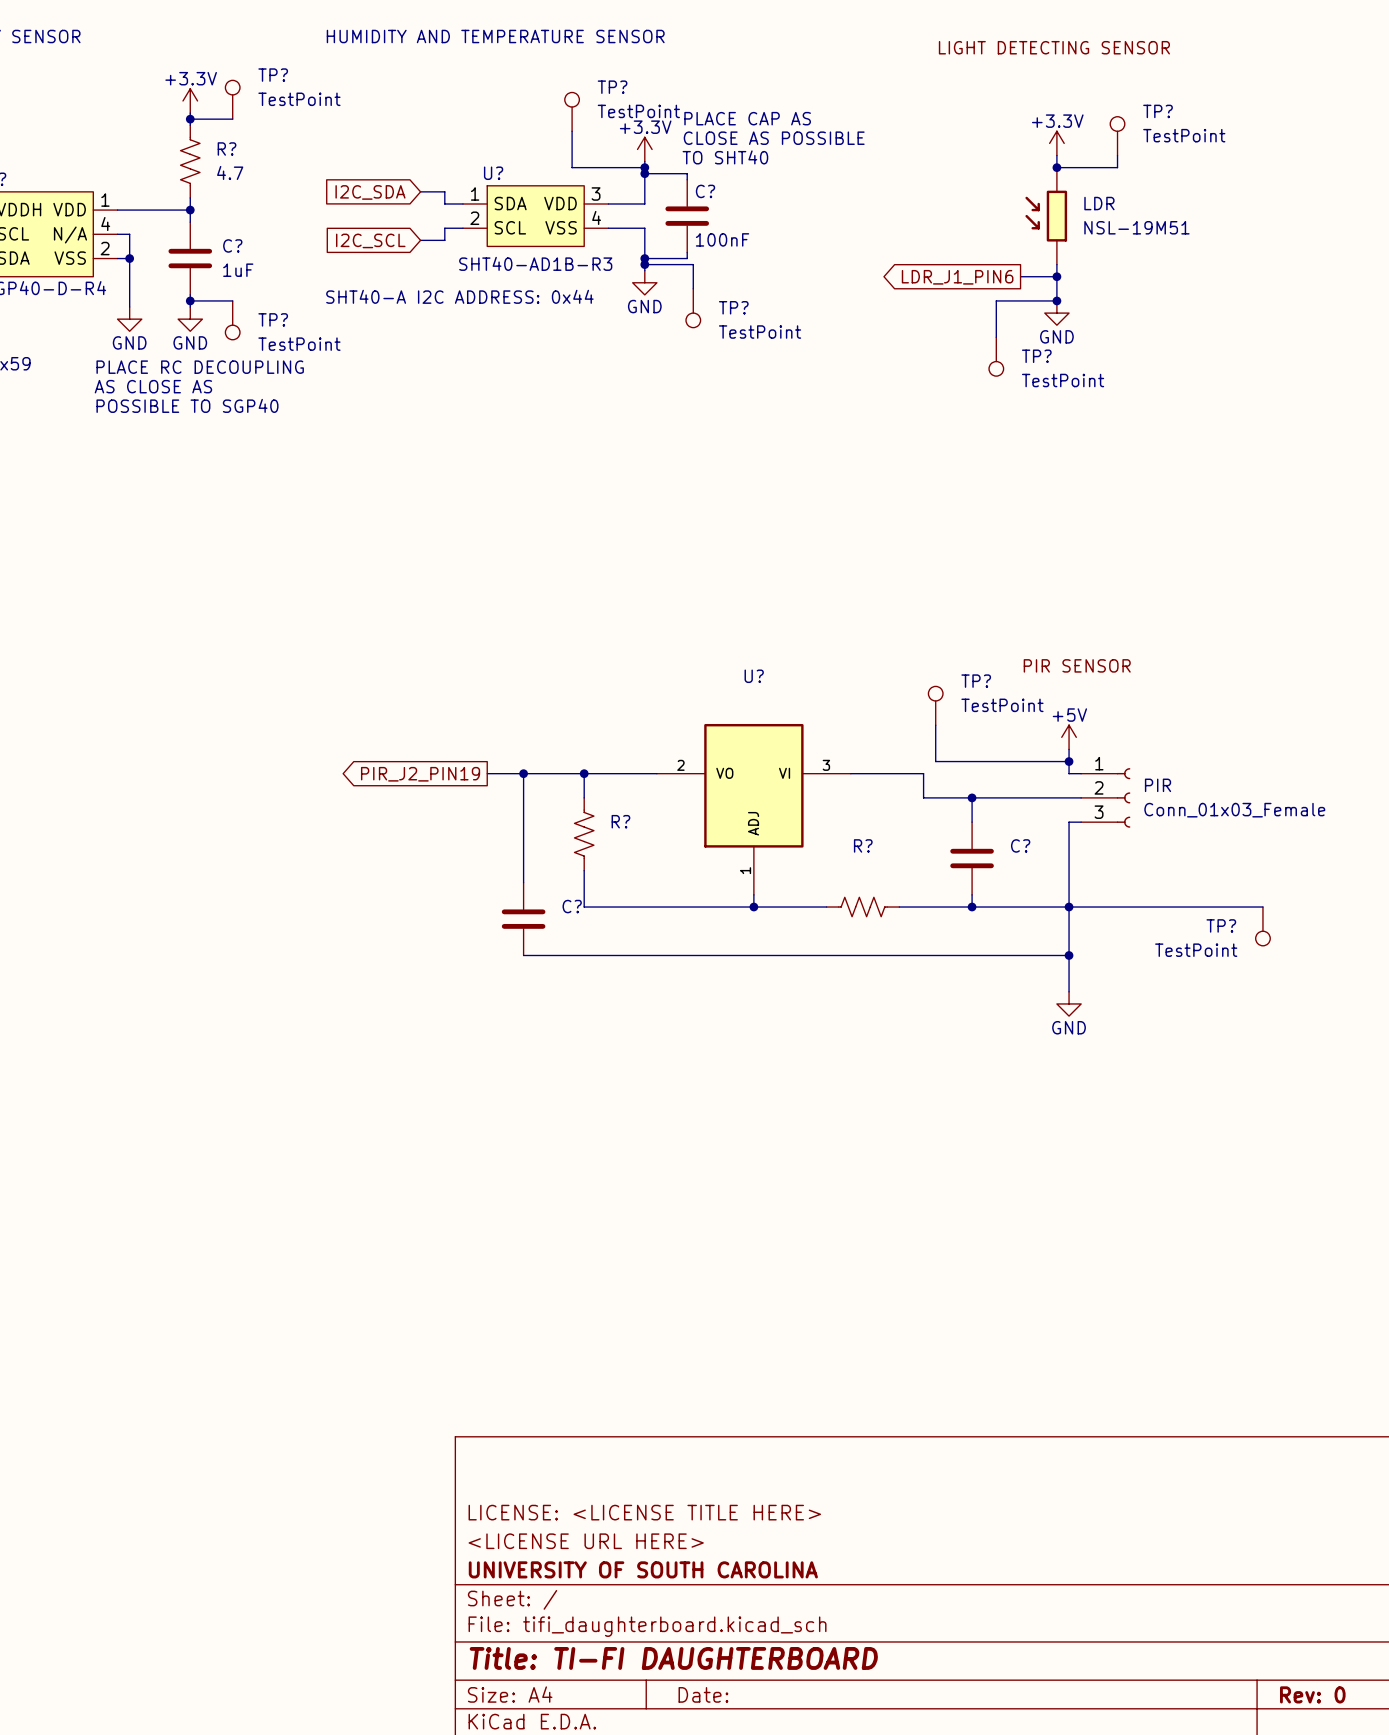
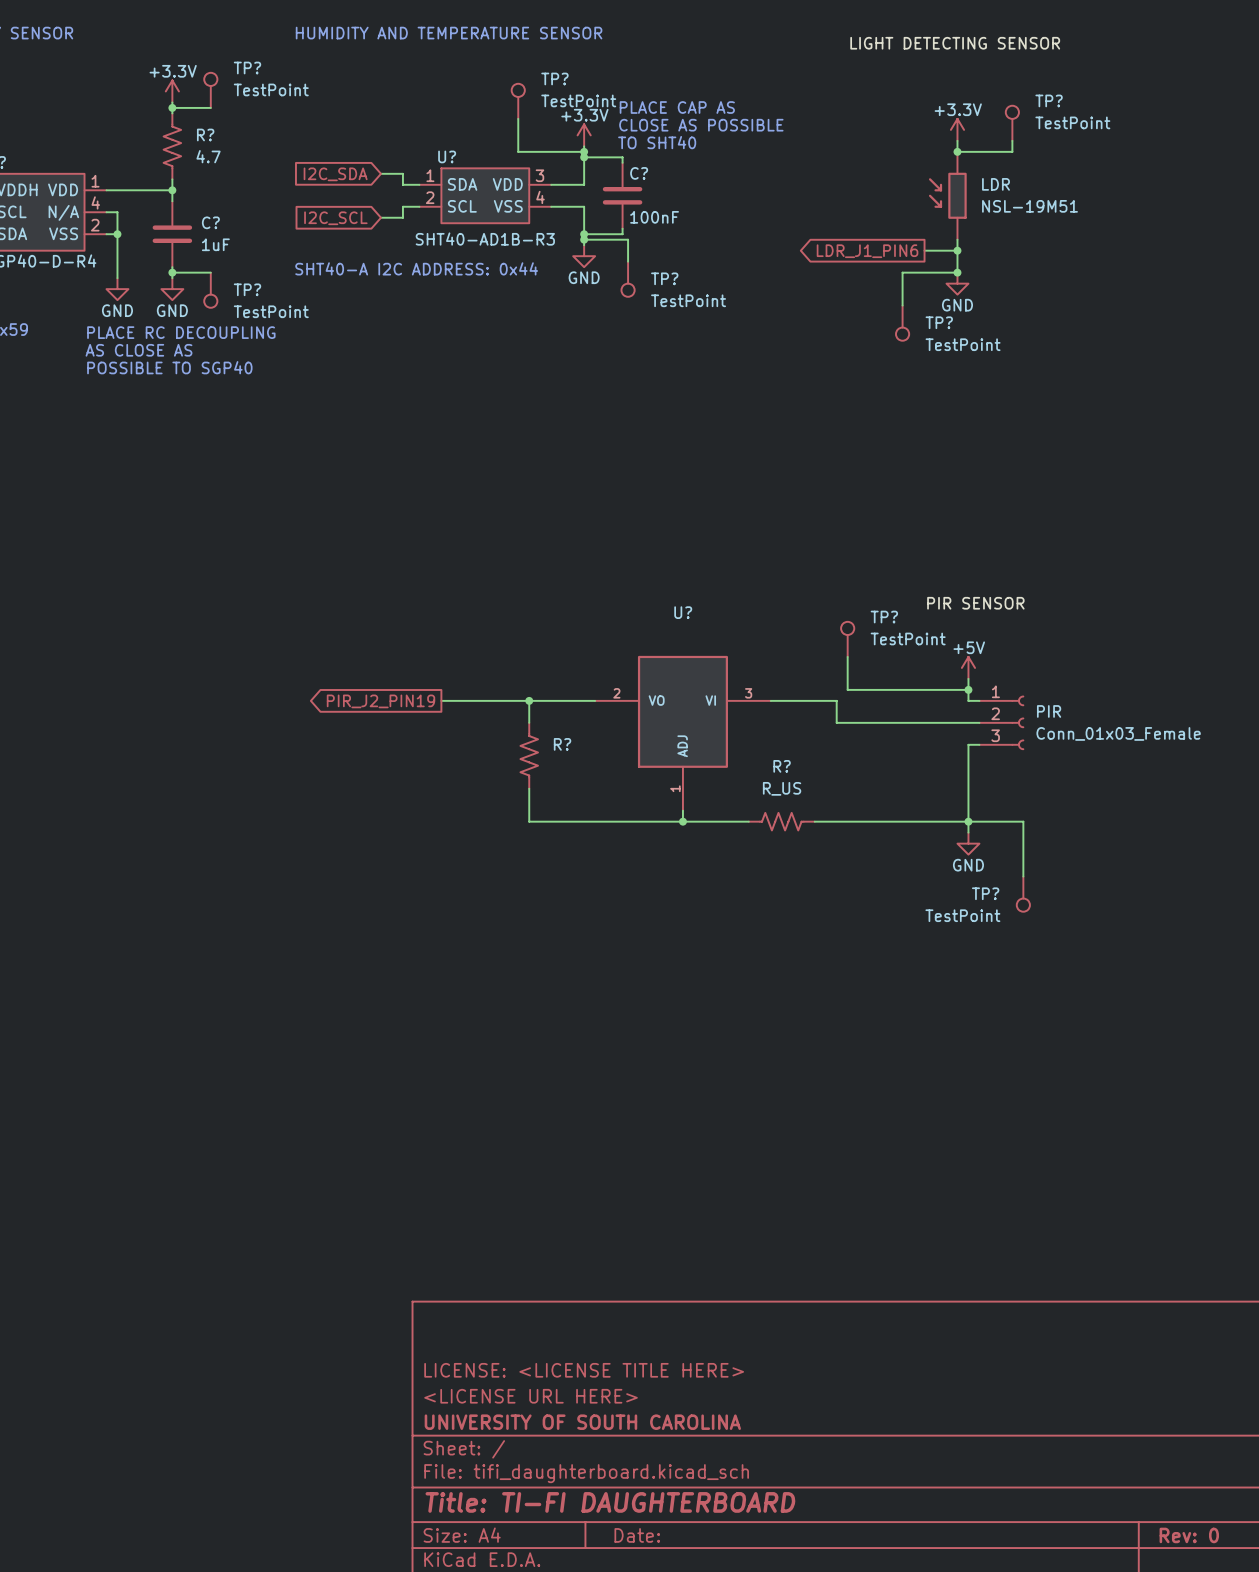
wire: (523, 773) (523, 882) -> none
junction: (523, 773) -> none
wire: (972, 797) (972, 822) -> none
junction: (972, 797) -> none
C?: (972, 858) -> none
R? value: none -> R_US (782, 788)
wire: (972, 894) (972, 907) -> none
junction: (972, 907) -> none
wire: (1129, 907) (1262, 907) -> (1023, 821) (1023, 876)
C?: (523, 919) -> none
wire: (1069, 919) (1069, 991) -> none
TP? position: (1262, 926) -> (1023, 894)
wire: (523, 955) (1069, 955) -> none
junction: (1069, 955) -> none
power symbol position: GND (1069, 1003) -> GND (968, 843)

